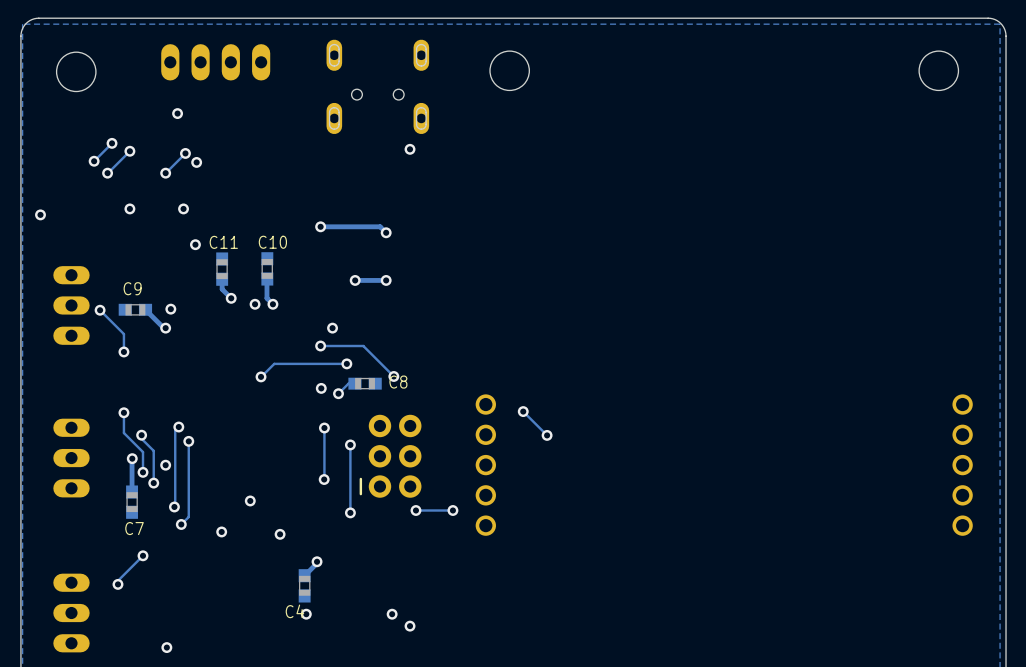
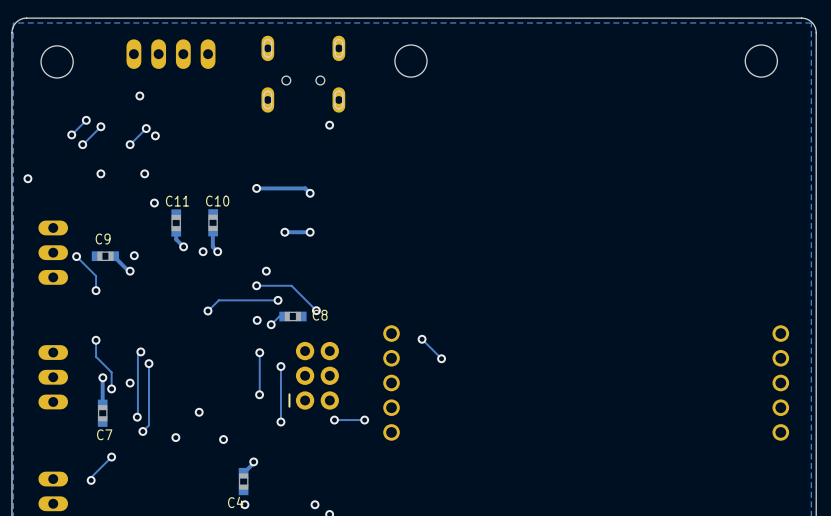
track: (141, 435) (141, 438) (153, 450) (153, 483) -> none
via: (141, 435) -> none
via: (153, 483) -> none

